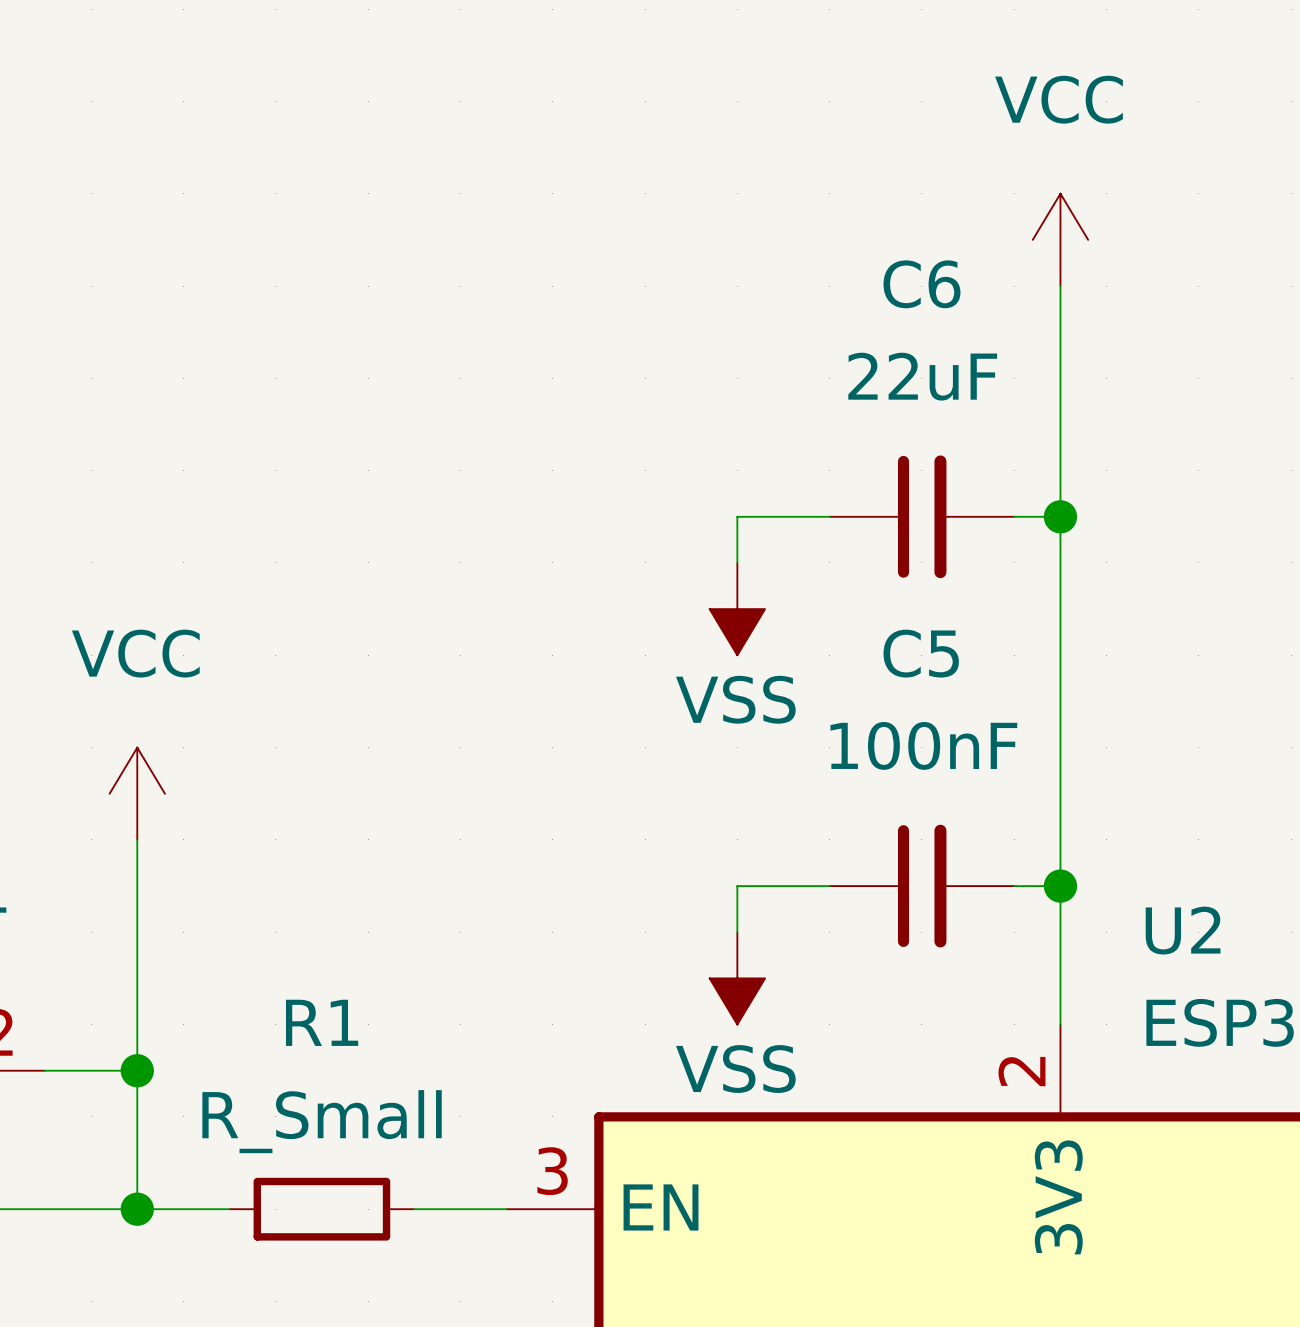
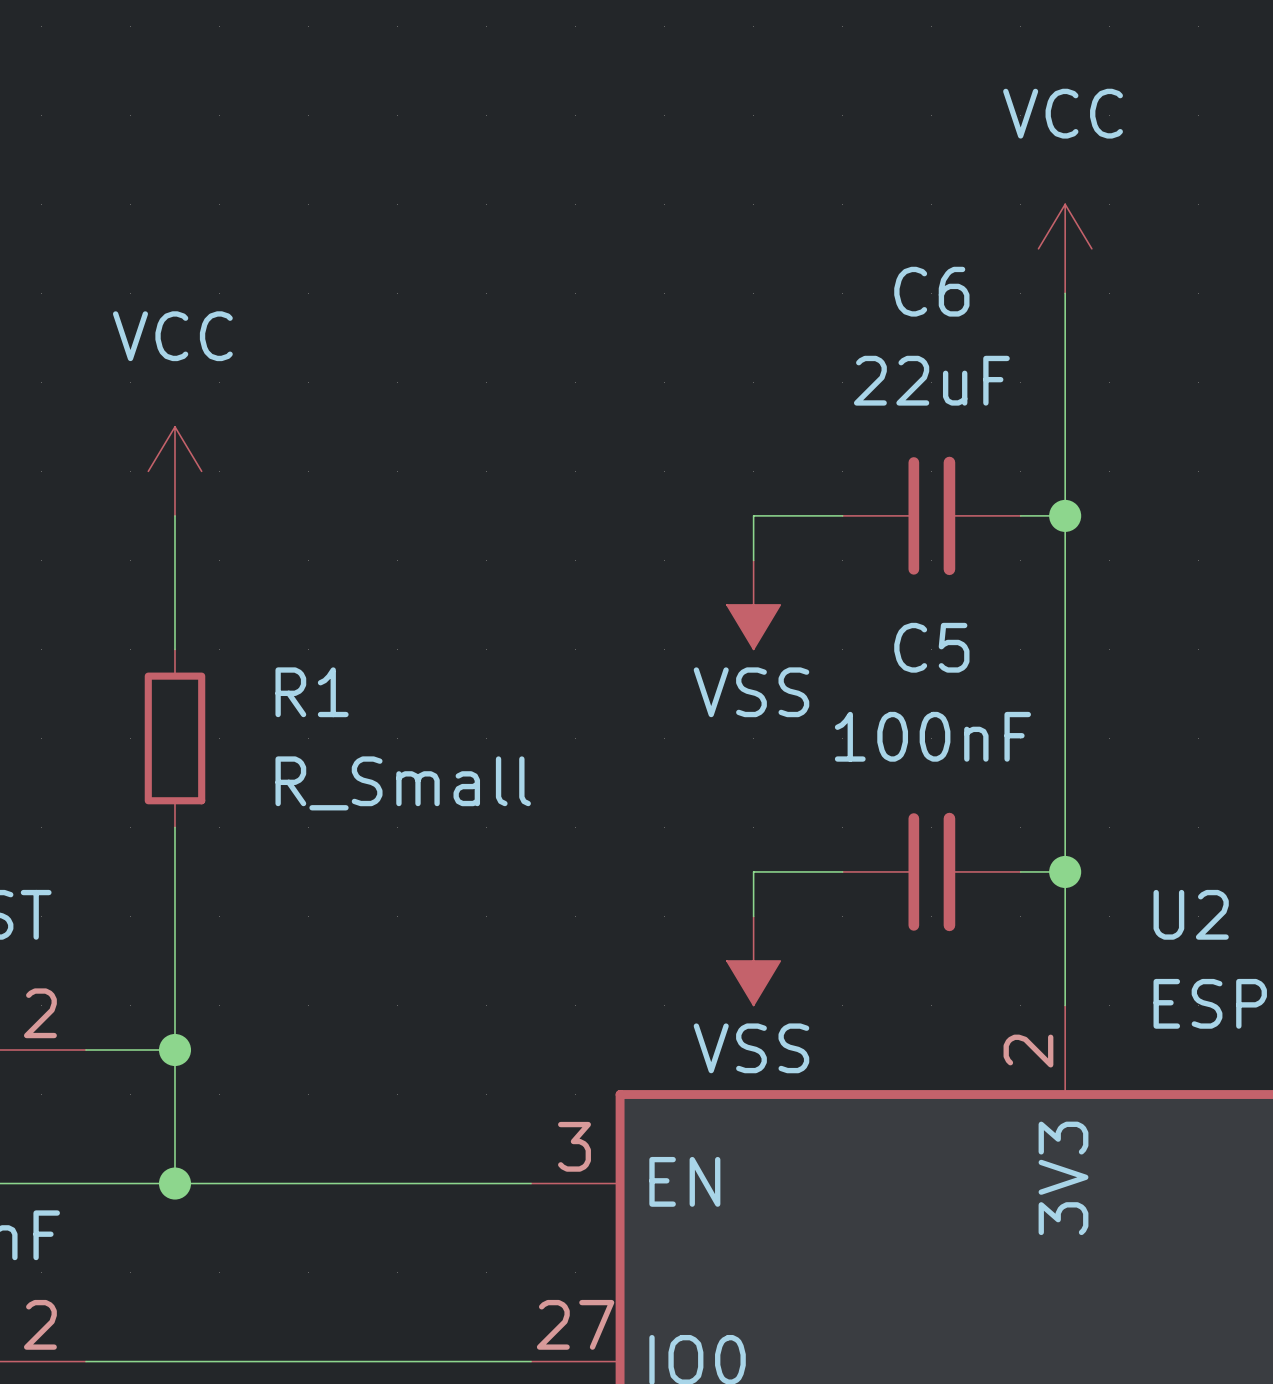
wire: none -> (174, 515) (174, 649)
power symbol position: VCC (137, 793) -> VCC (174, 471)
R1 value position: R_Small (322, 1121) -> R_Small (403, 783)
wire: none -> (264, 1183) (442, 1183)
R1 rotation: 0° (321, 1209) -> 90° clockwise (174, 738)
R1 position: (321, 1209) -> (174, 738)

